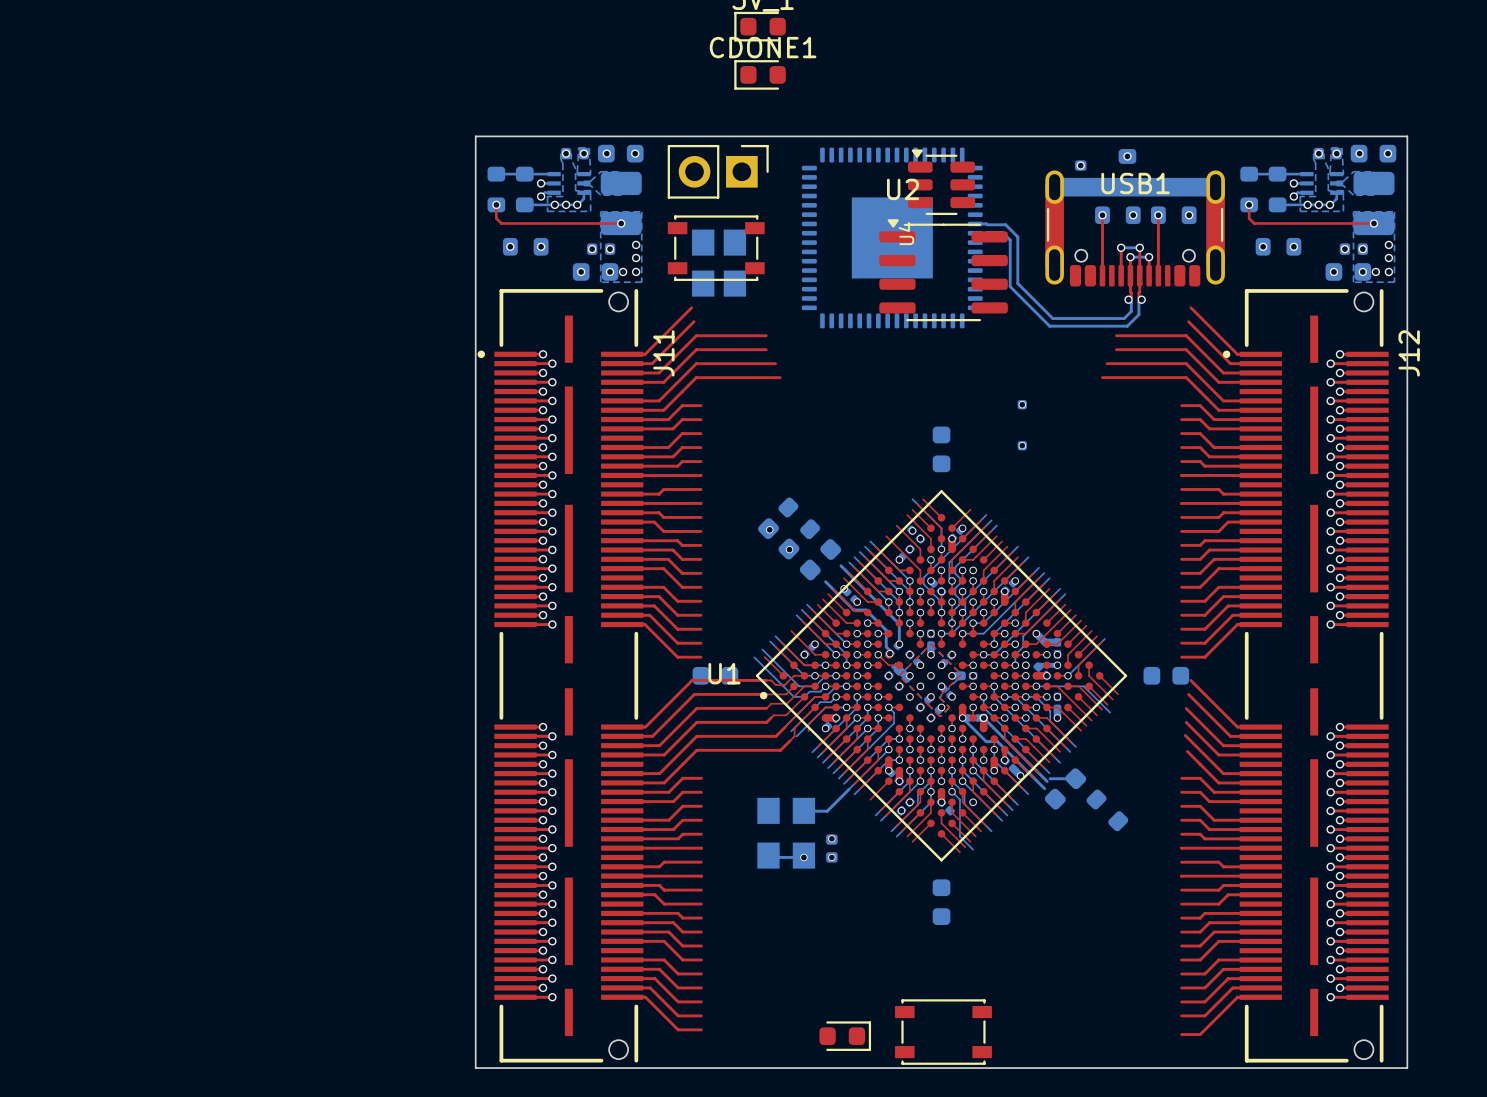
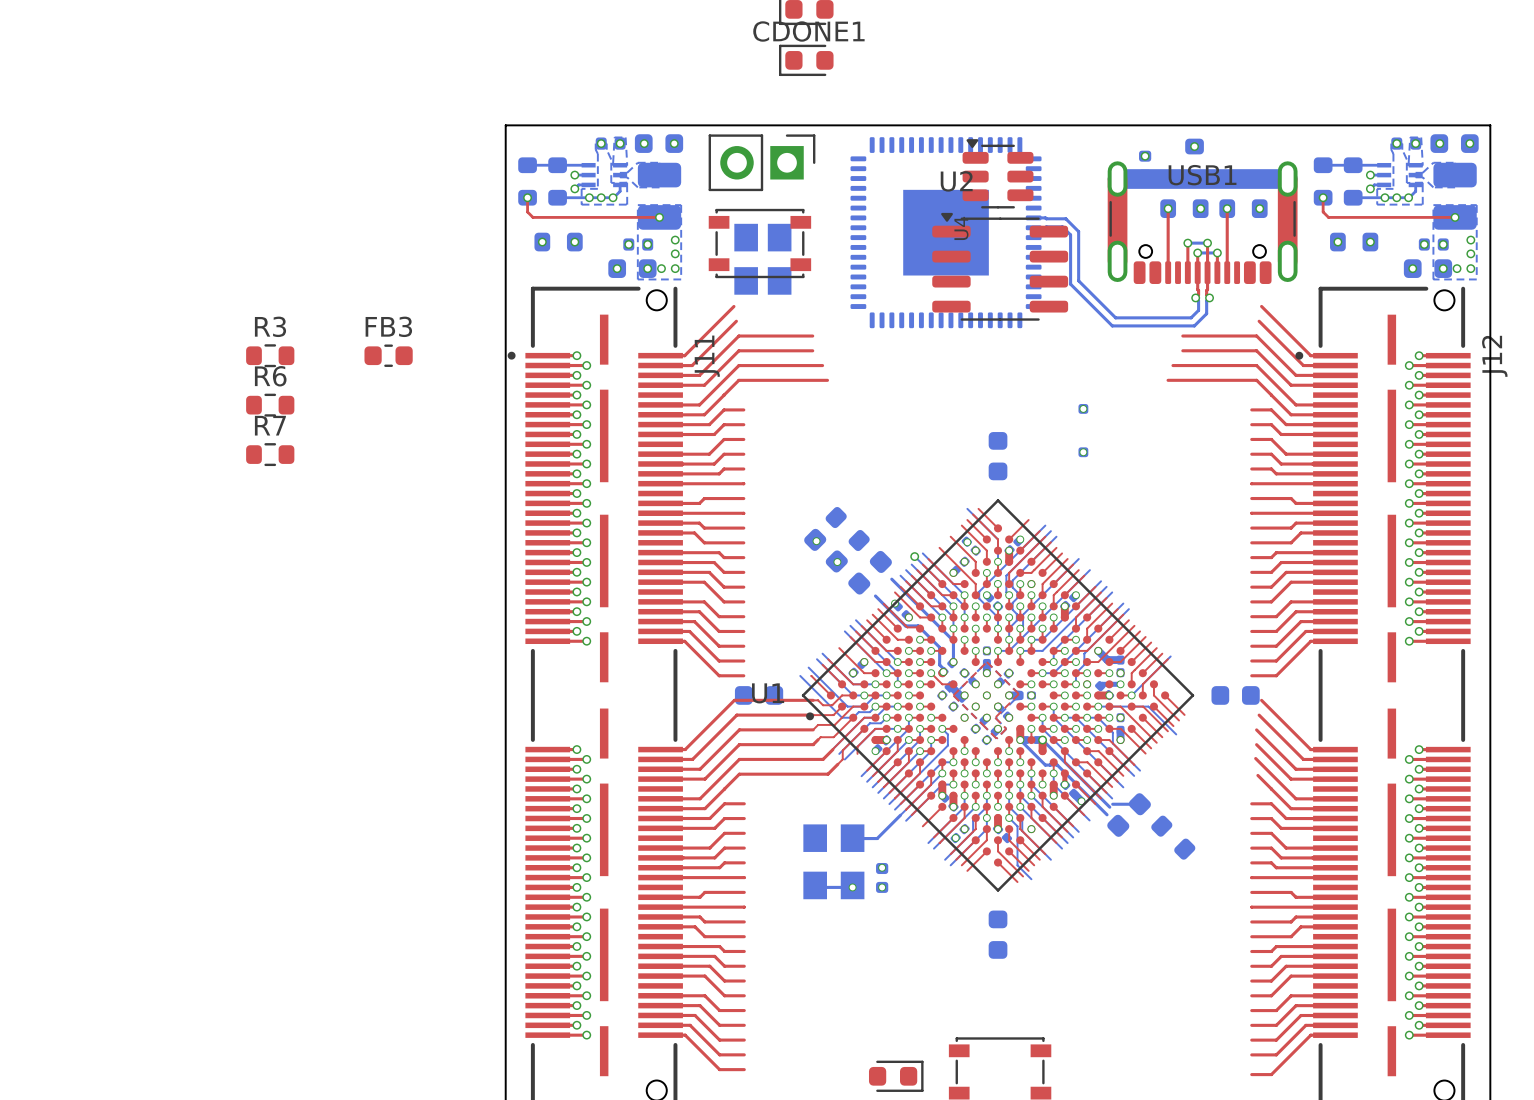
R3: none -> (270, 355)
FB3: none -> (388, 355)
R6: none -> (270, 405)
R7: none -> (270, 454)
via: none -> (914, 556)

